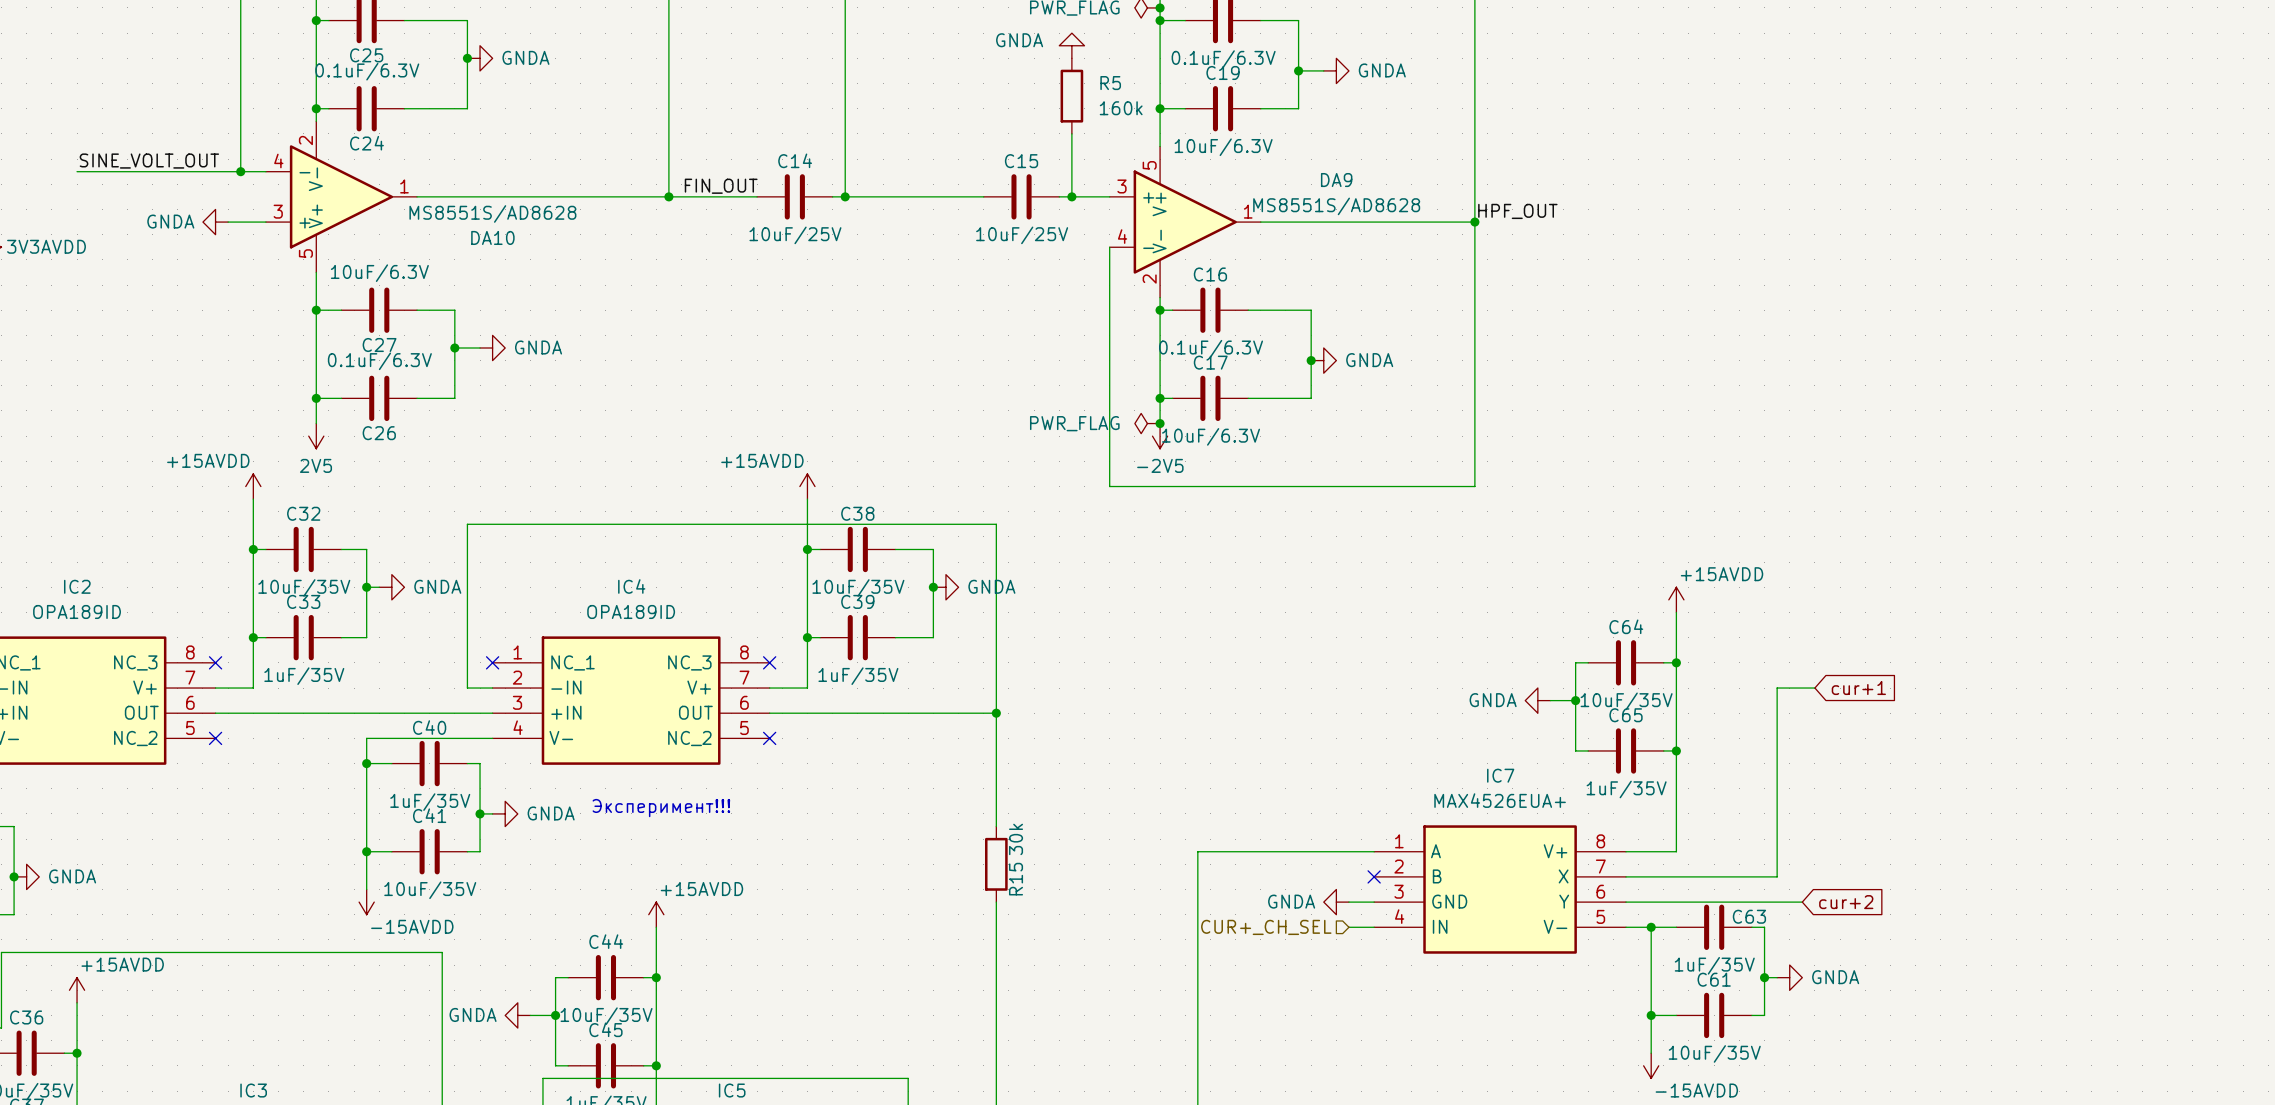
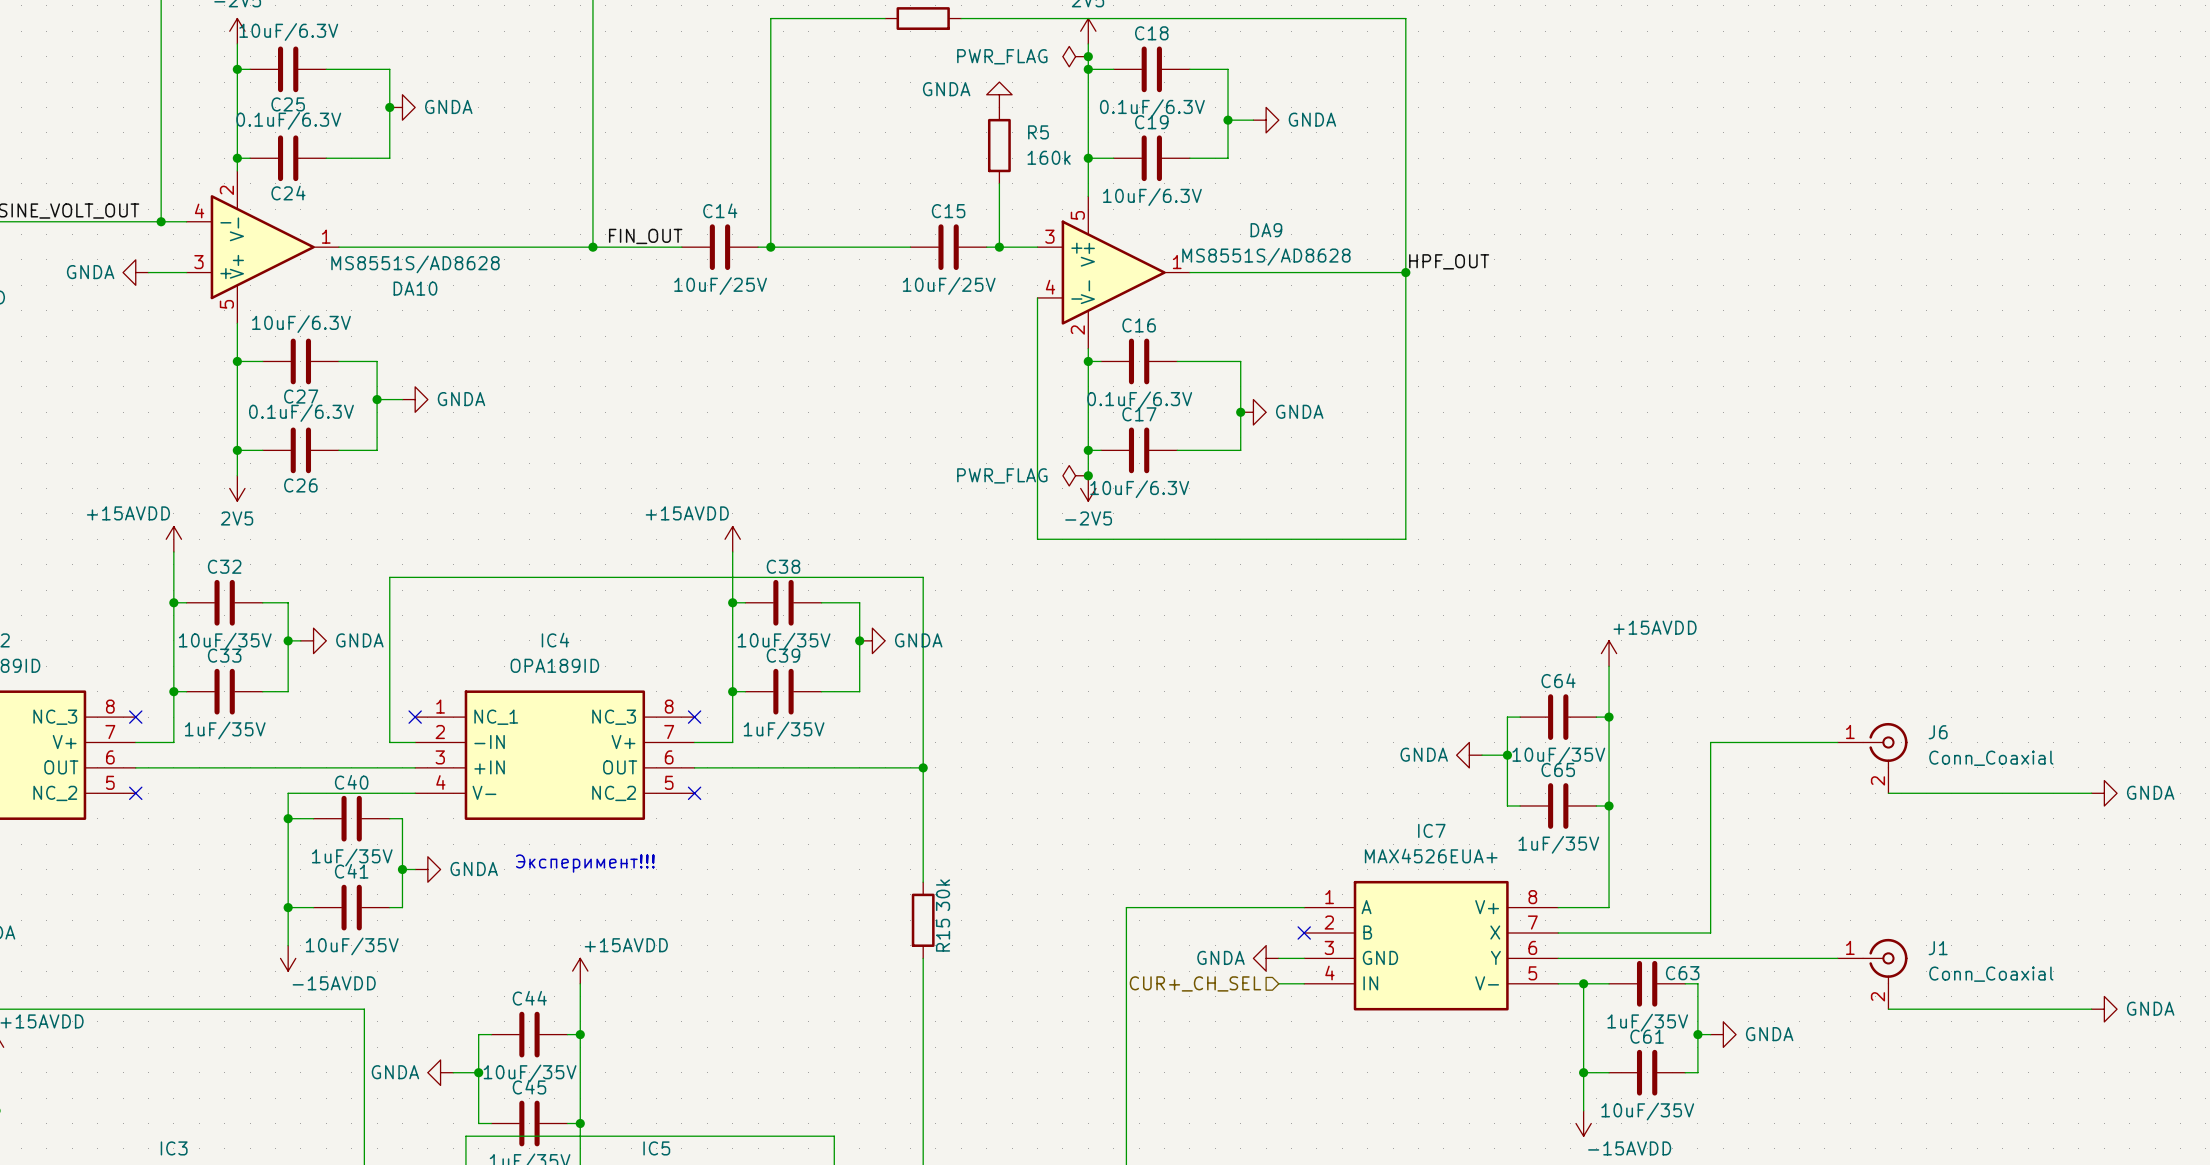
wire: none -> (1748, 742) (1837, 742)
global label: cur+1 (1858, 688) -> none
J6: none -> Conn_Coaxial (1872, 758)
wire: none -> (1888, 793) (2091, 793)
power symbol: none -> GNDA (2104, 793)
wire: none -> (1736, 958) (1837, 958)
global label: cur+2 (1846, 902) -> none
J1: none -> Conn_Coaxial (1872, 974)
wire: none -> (1888, 1009) (2091, 1009)
power symbol: none -> GNDA (2104, 1009)

